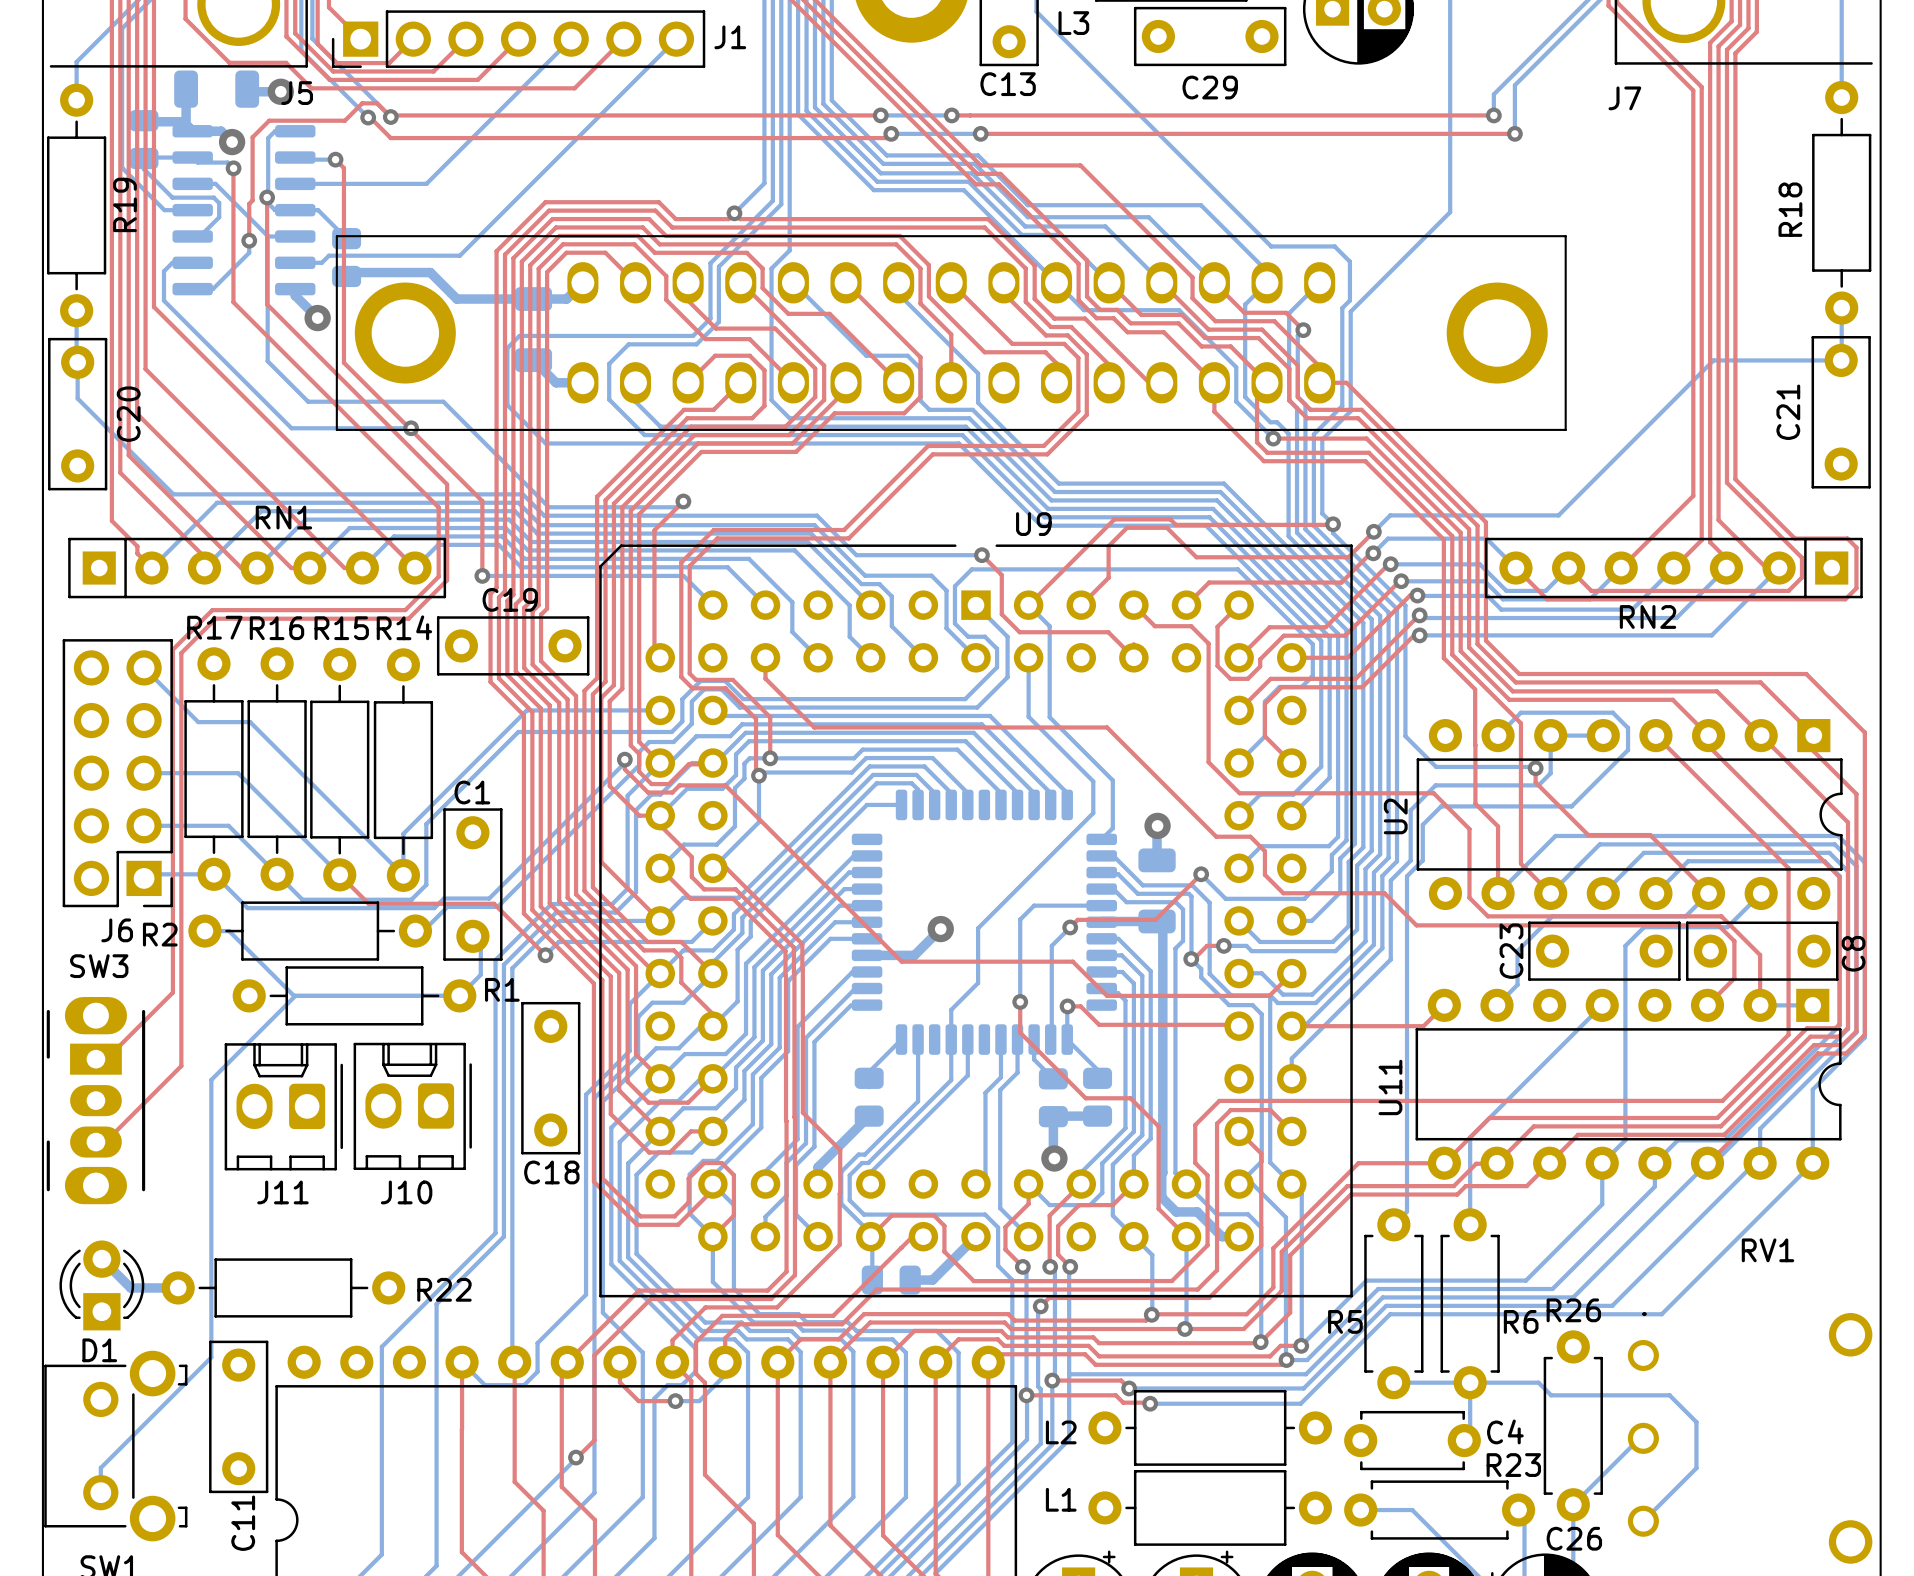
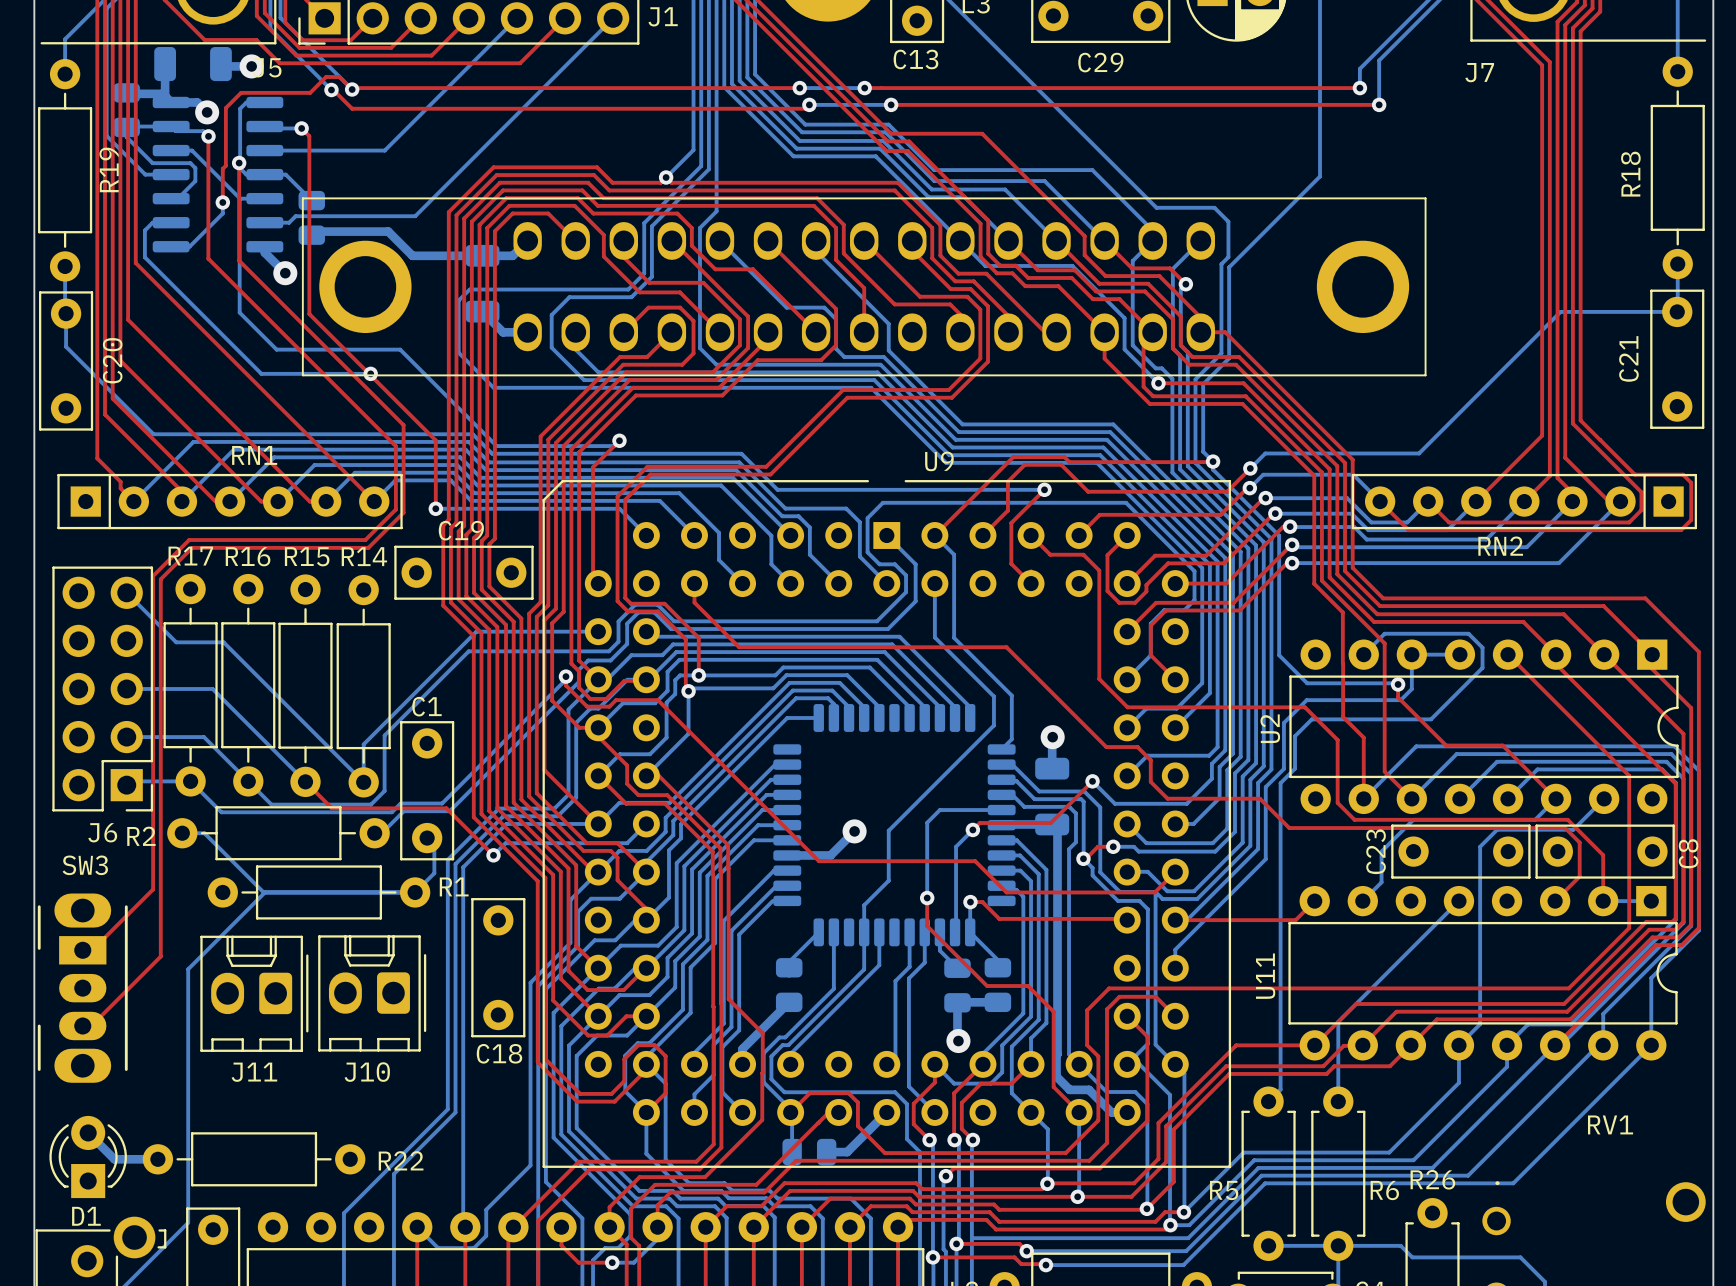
bottom track: none -> (892, 489) (1044, 489)
top track: (981, 555) (1001, 575) (1001, 614) (1019, 632) (1108, 632) (1112, 636) -> (1044, 489) (1011, 523) (1011, 563)
via: (981, 555) -> none
via: none -> (1044, 489)

